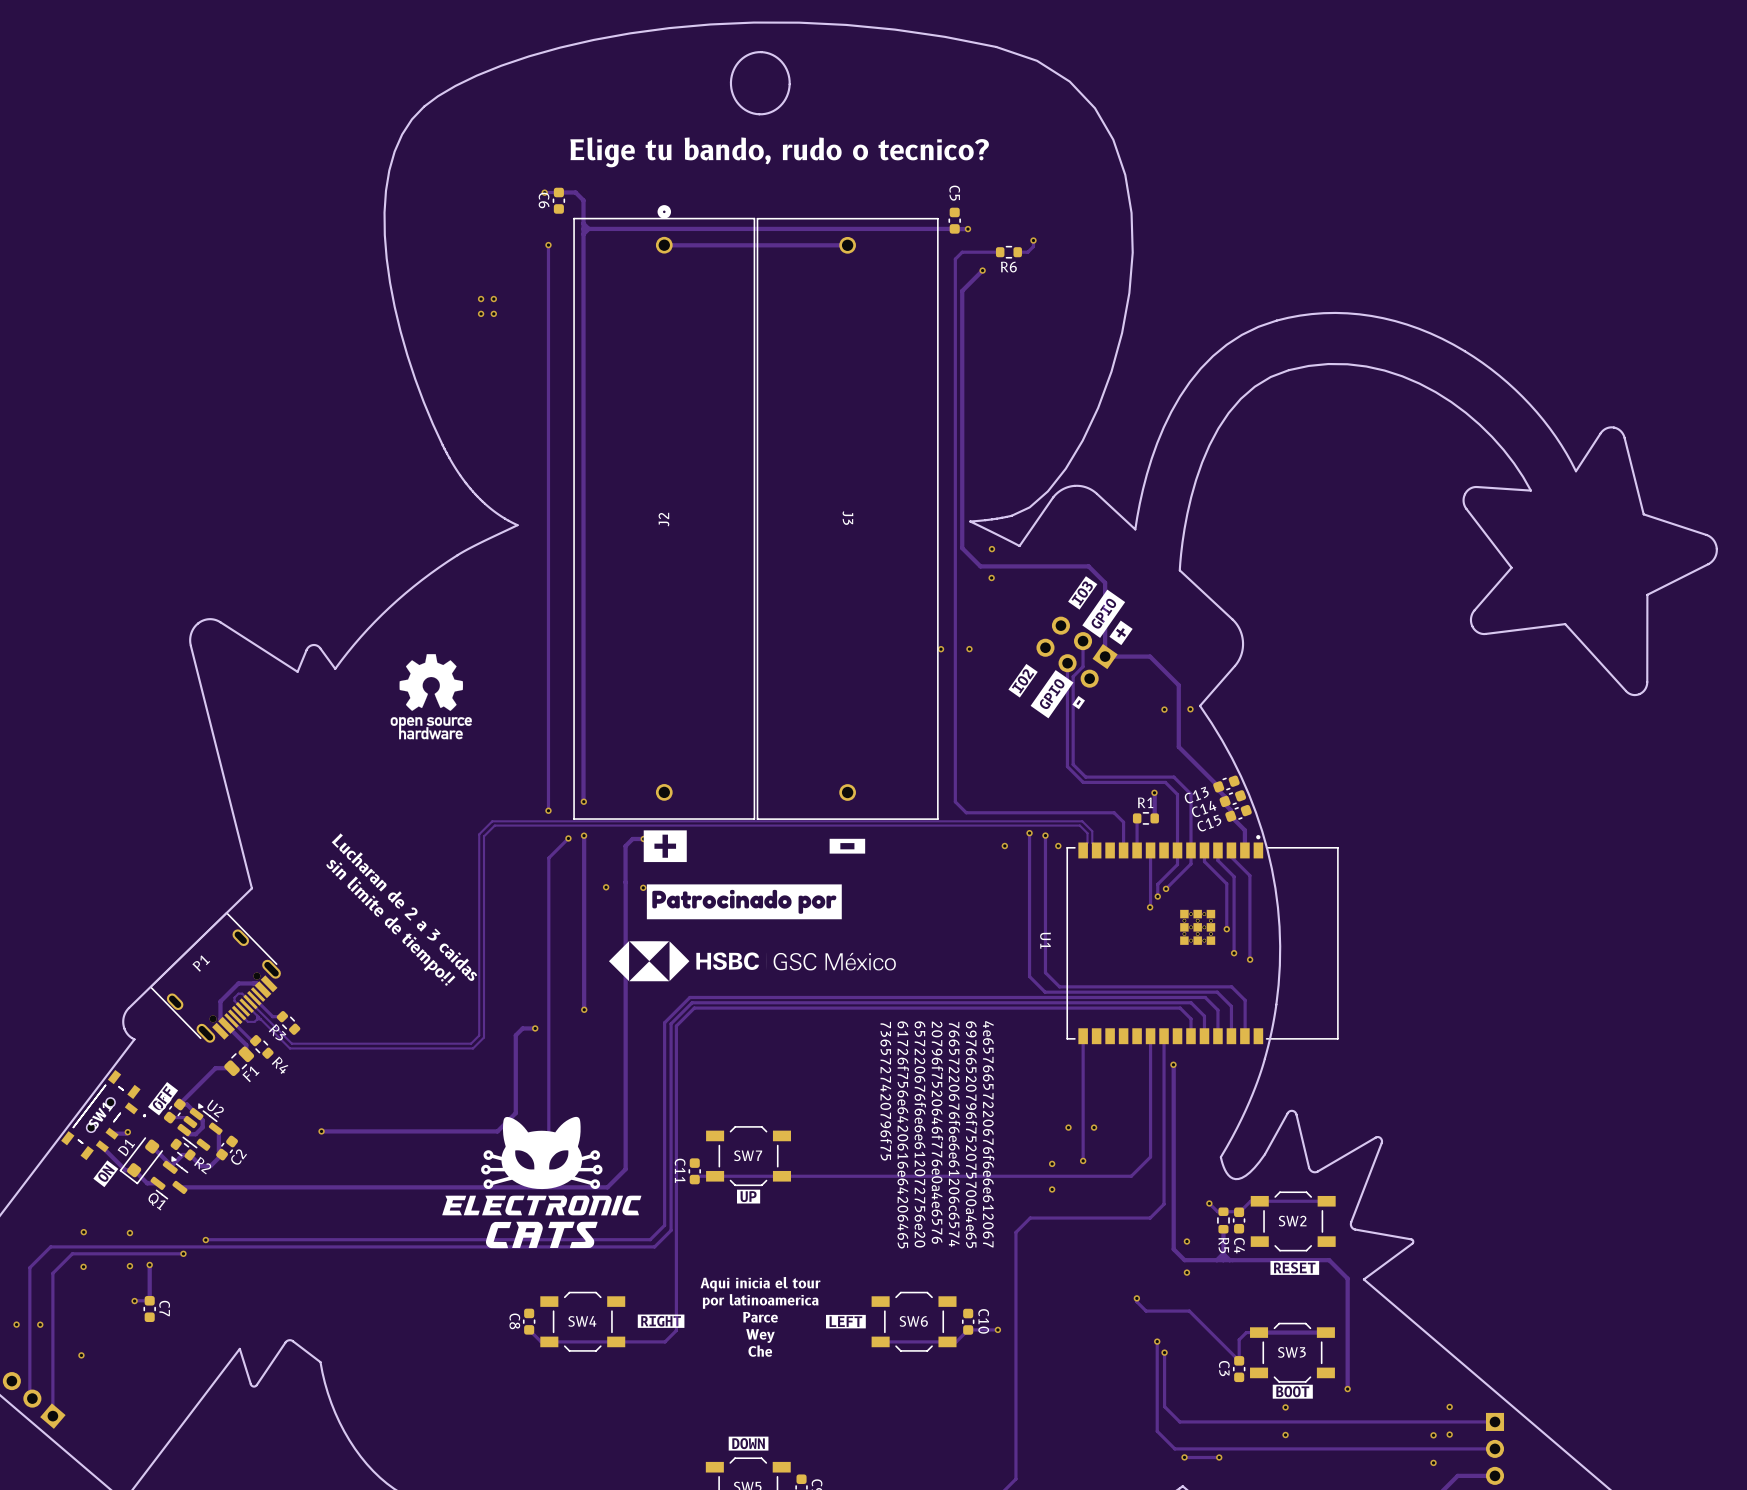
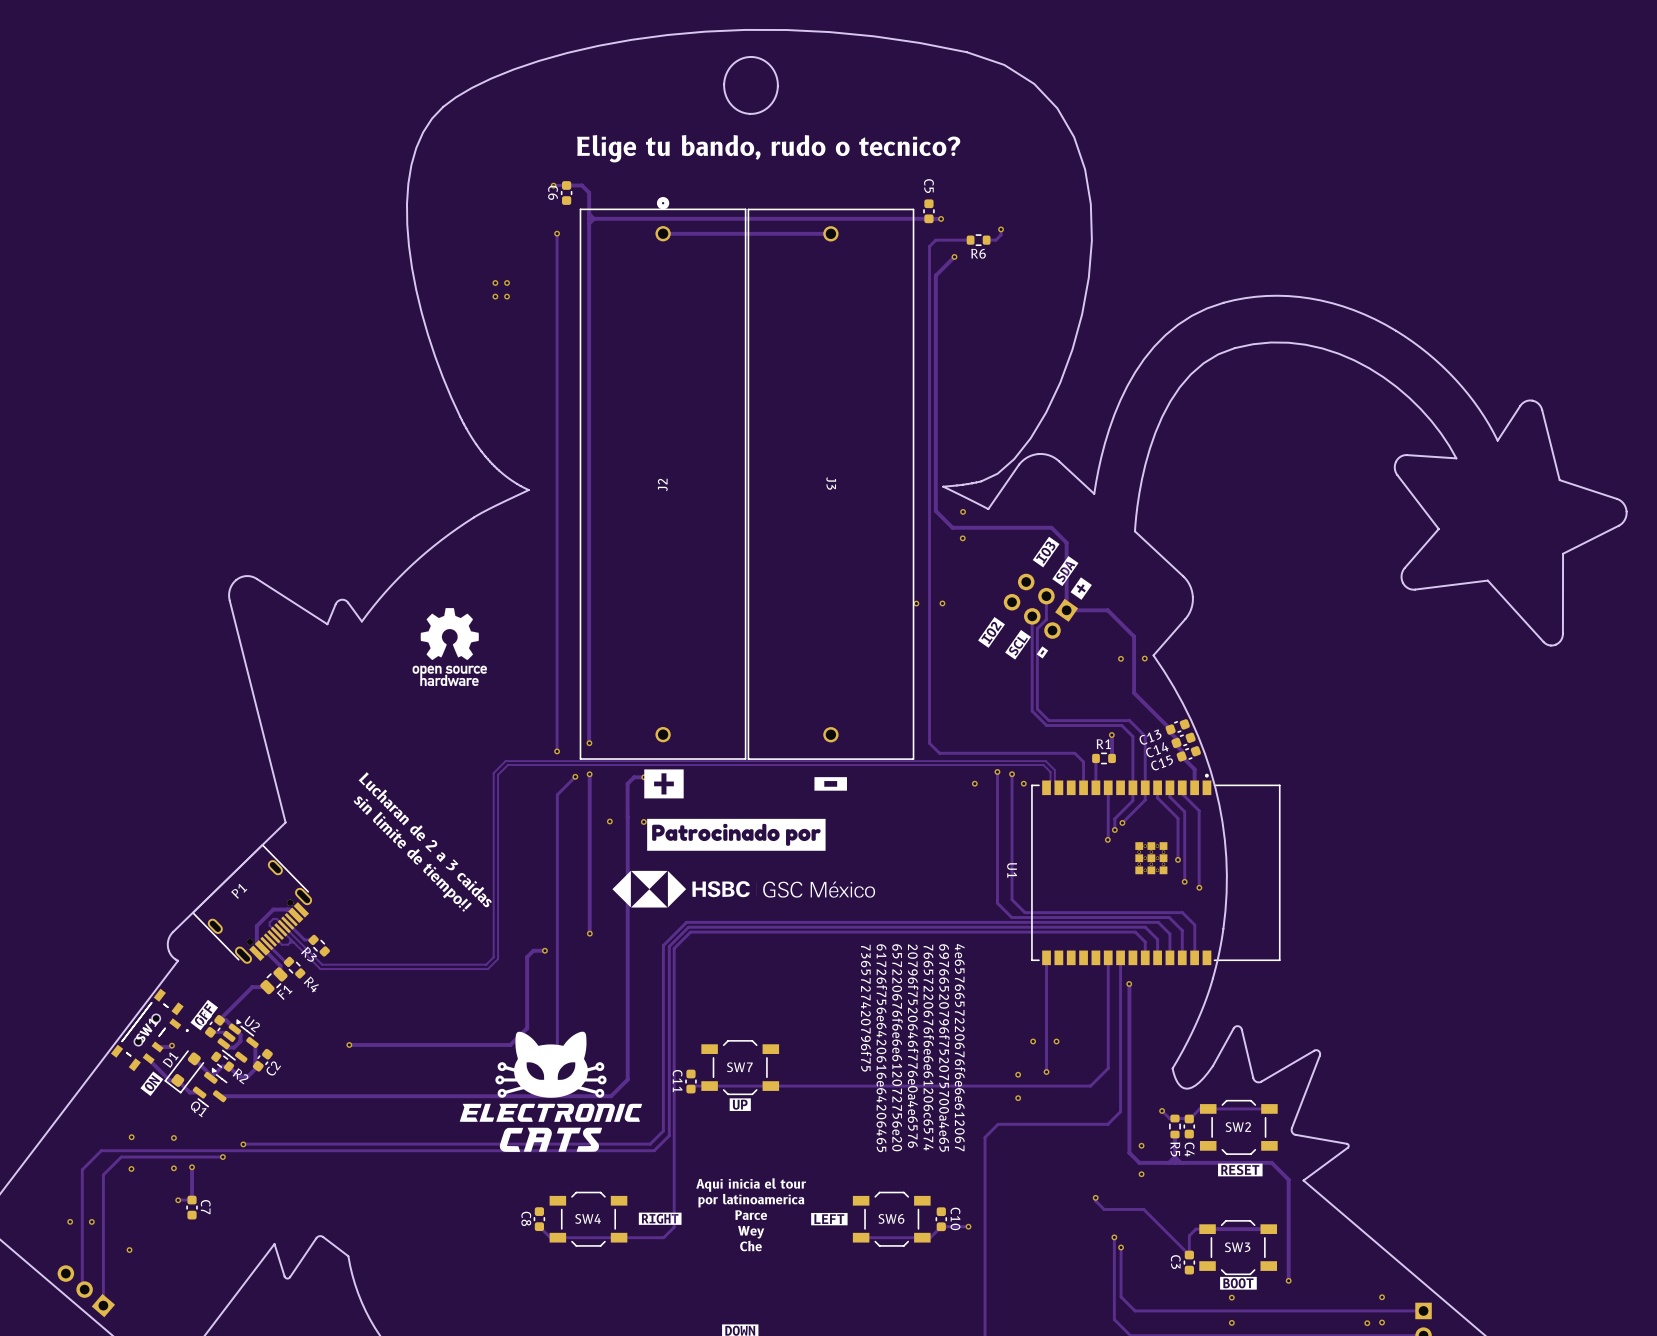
drawing shape: [1082, 589, 1126, 638] -> [1052, 556, 1079, 587]
drawing shape: [1030, 670, 1074, 719] -> [1005, 629, 1031, 660]

